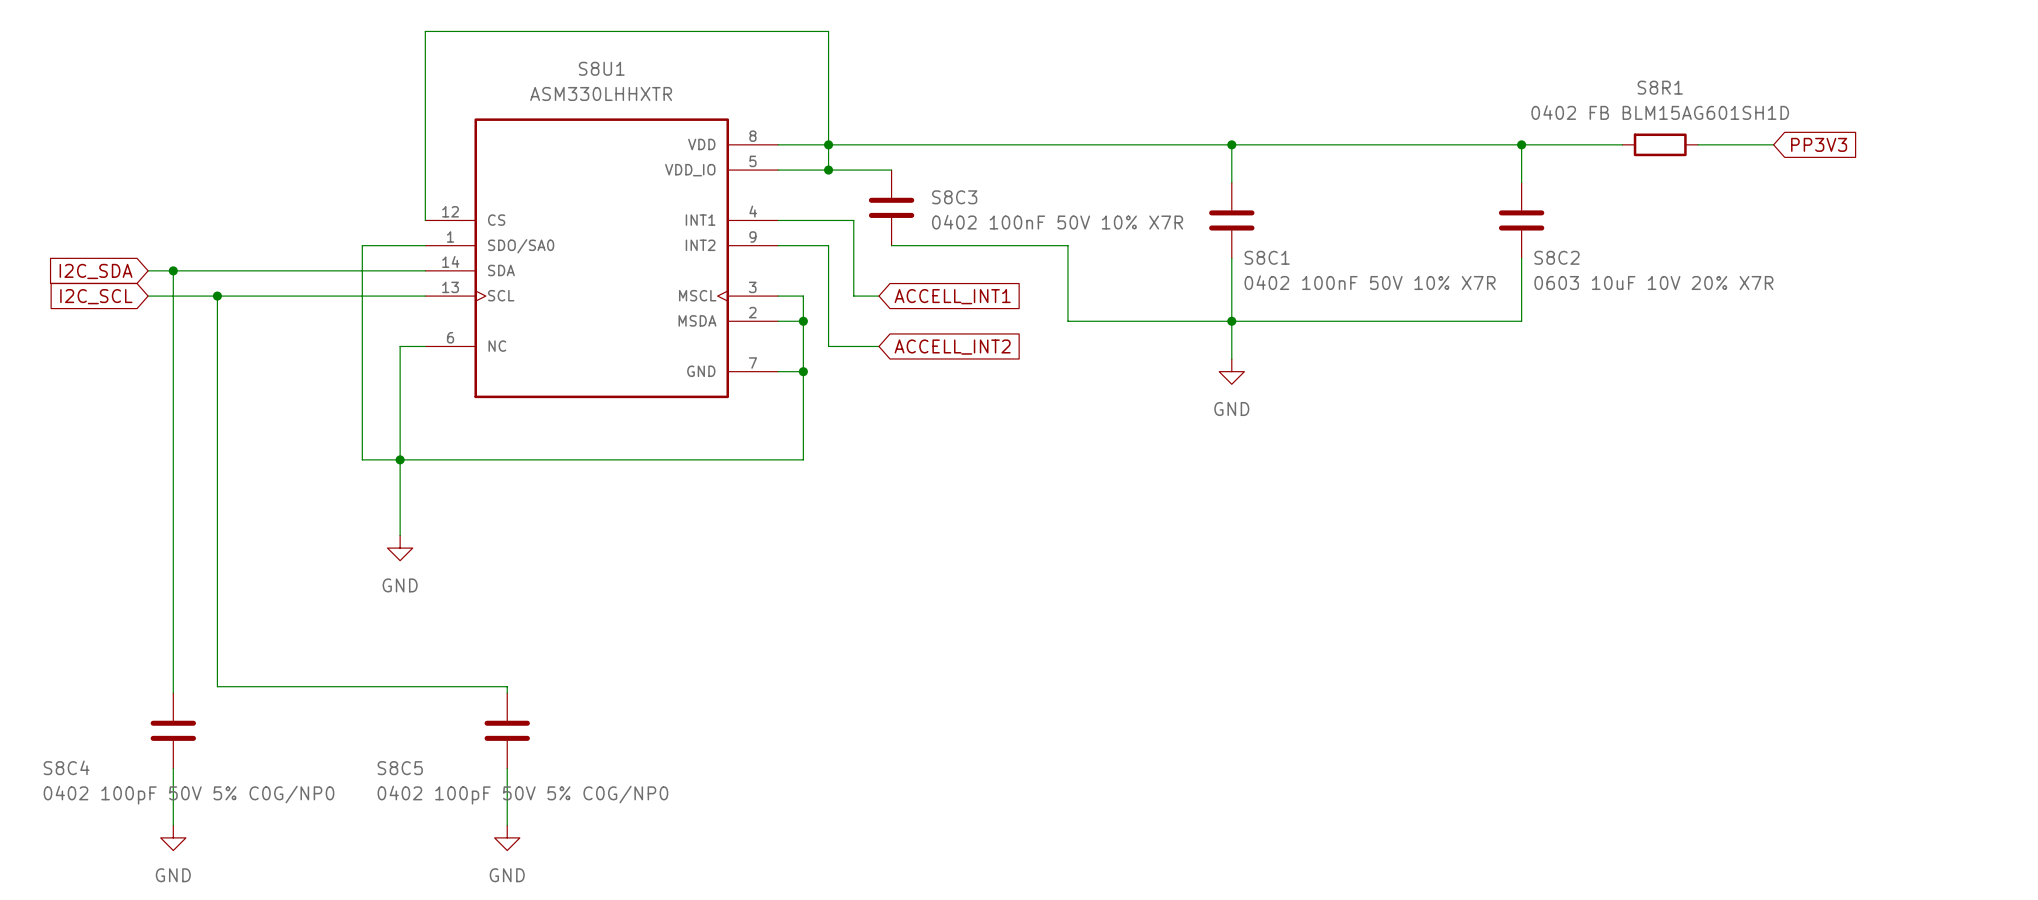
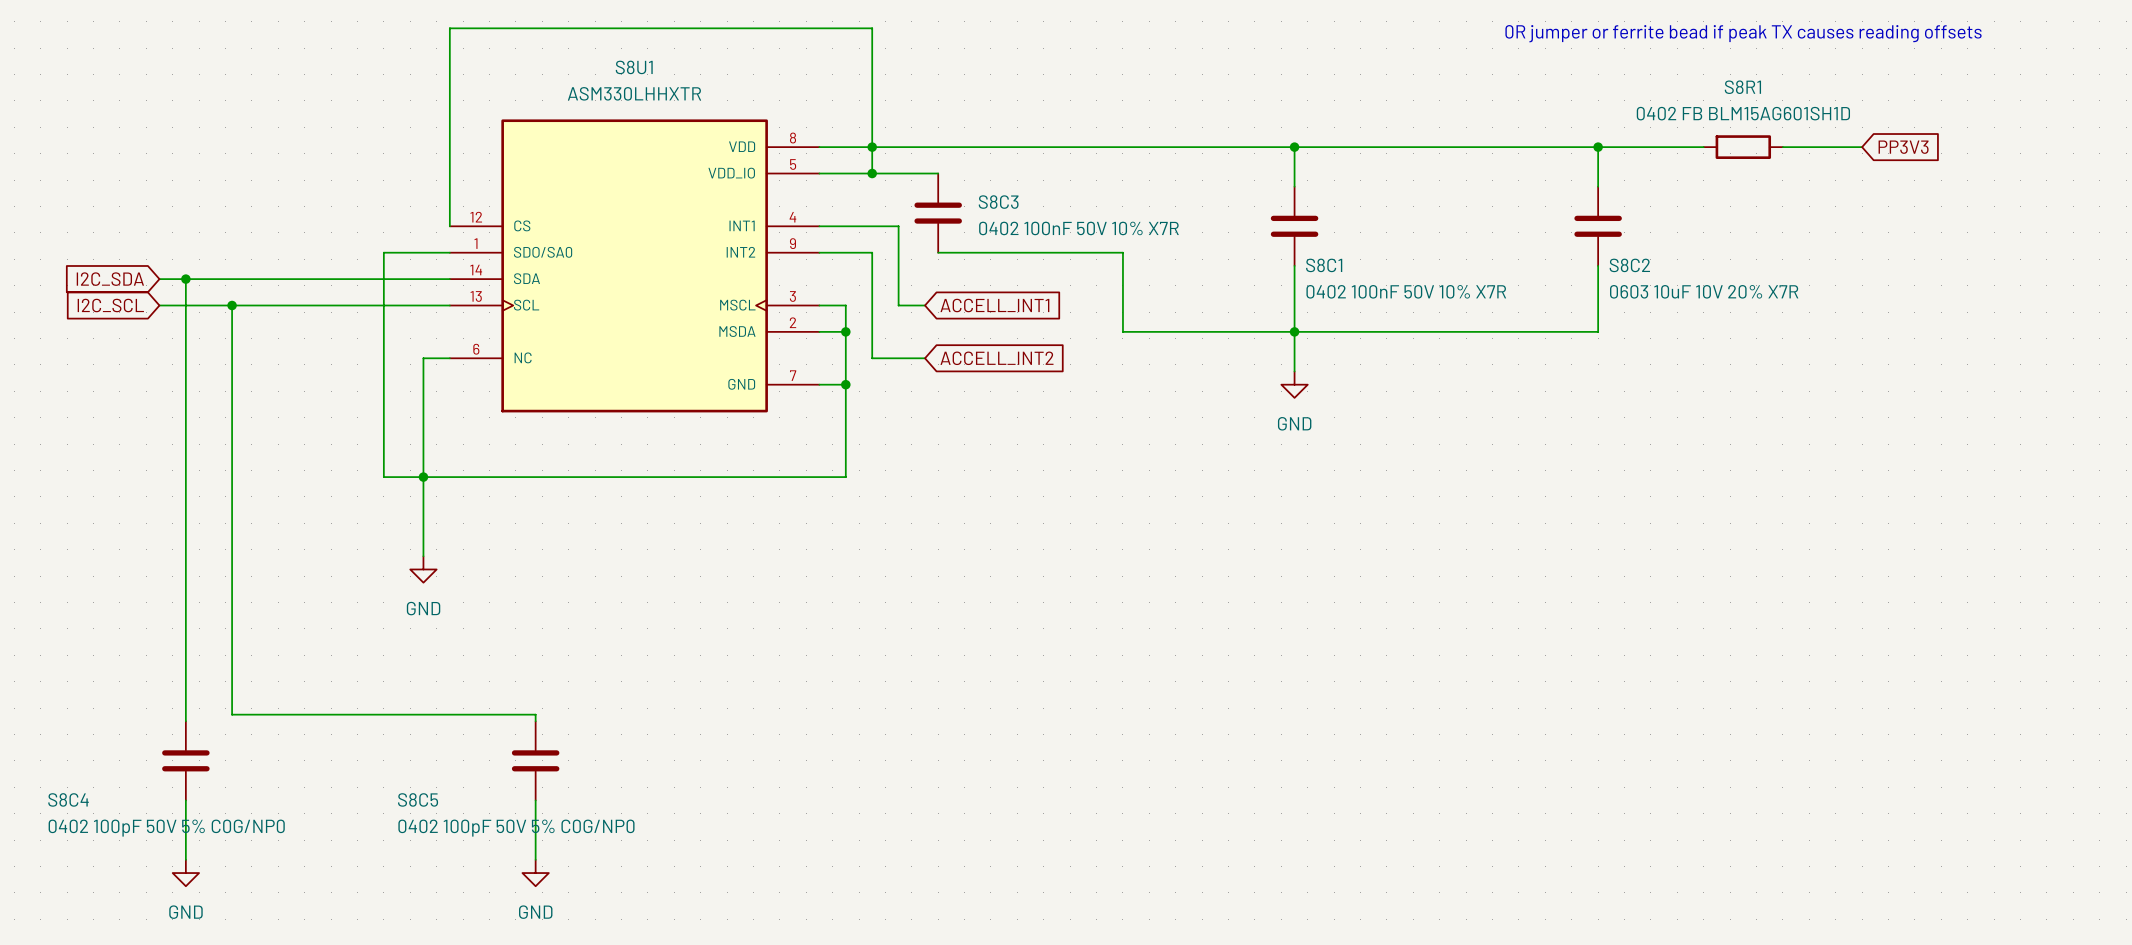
text: none -> 0R jumper or ferrite bead if peak TX causes reading offsets (1743, 33)

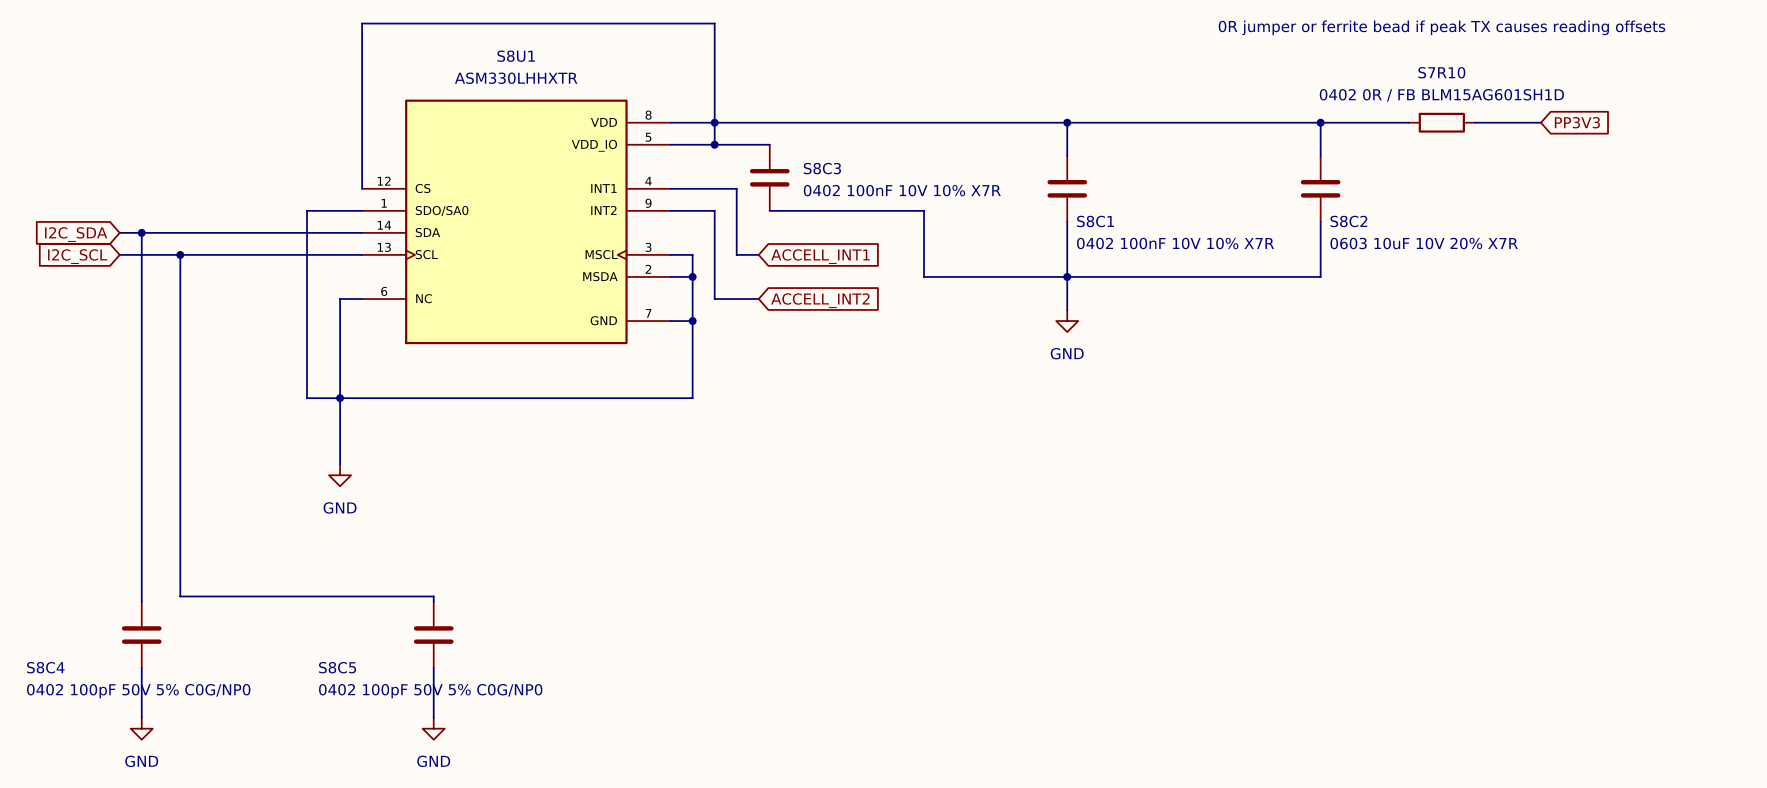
S8R1 name: S8R1 (1742, 87) -> S7R10 (1441, 72)
S8R1 value: 0402 FB BLM15AG601SH1D (1743, 113) -> 0402 0R / FB BLM15AG601SH1D (1441, 95)
S8C3 value: 0402 100nF 50V 10% X7R (1078, 228) -> 0402 100nF 10V 10% X7R (902, 190)
S8C1 value: 0402 100nF 50V 10% X7R (1406, 291) -> 0402 100nF 10V 10% X7R (1175, 243)

